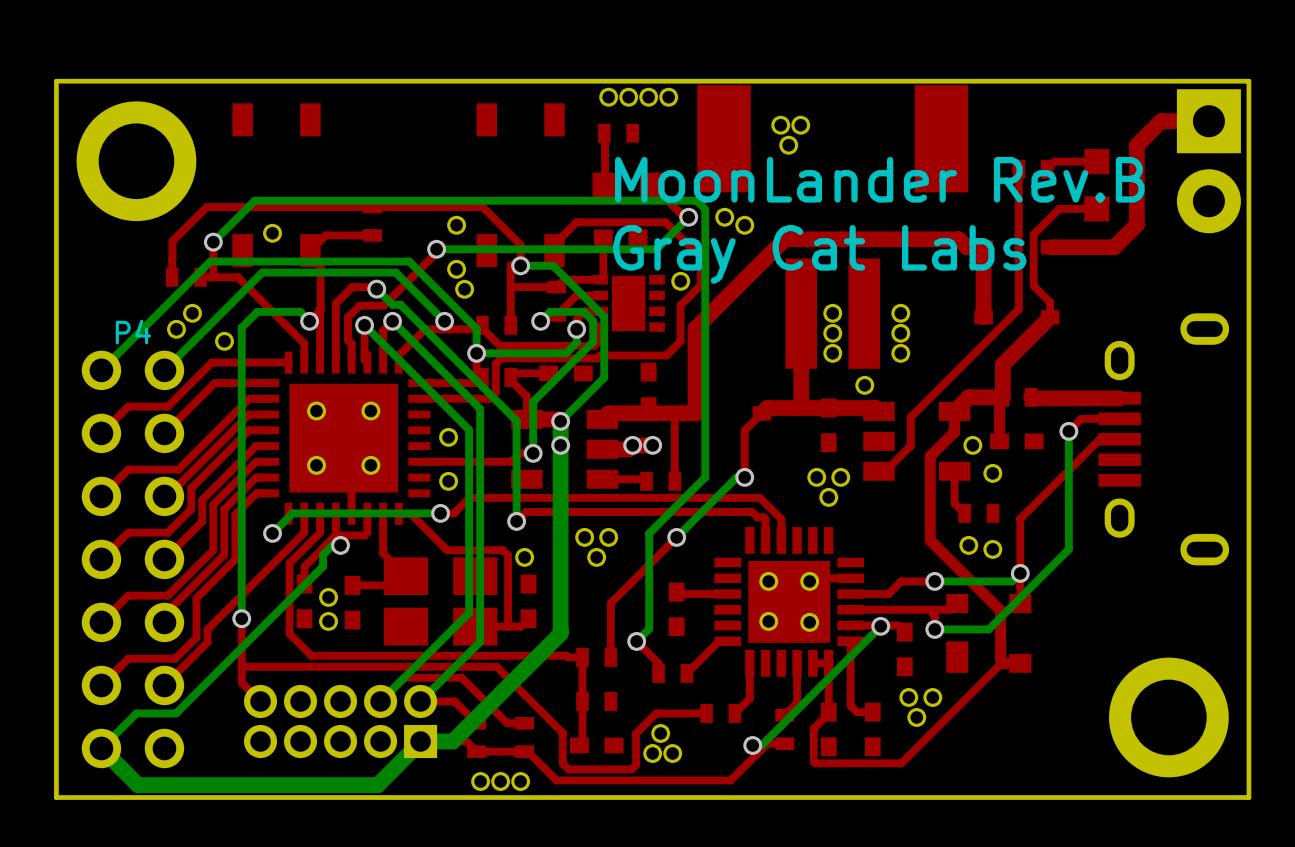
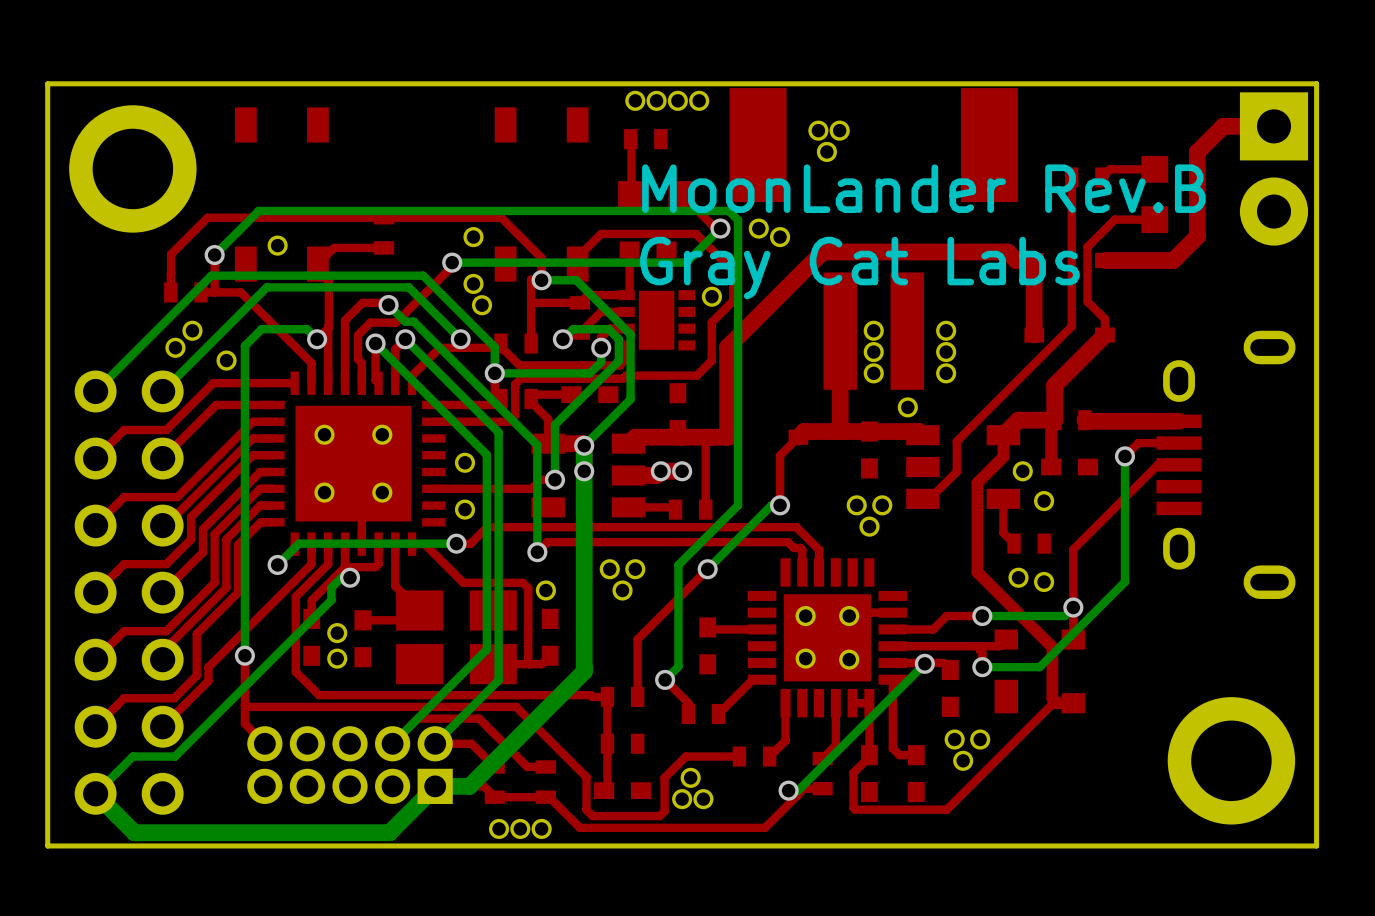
P4 name: P4 (133, 332) -> none

